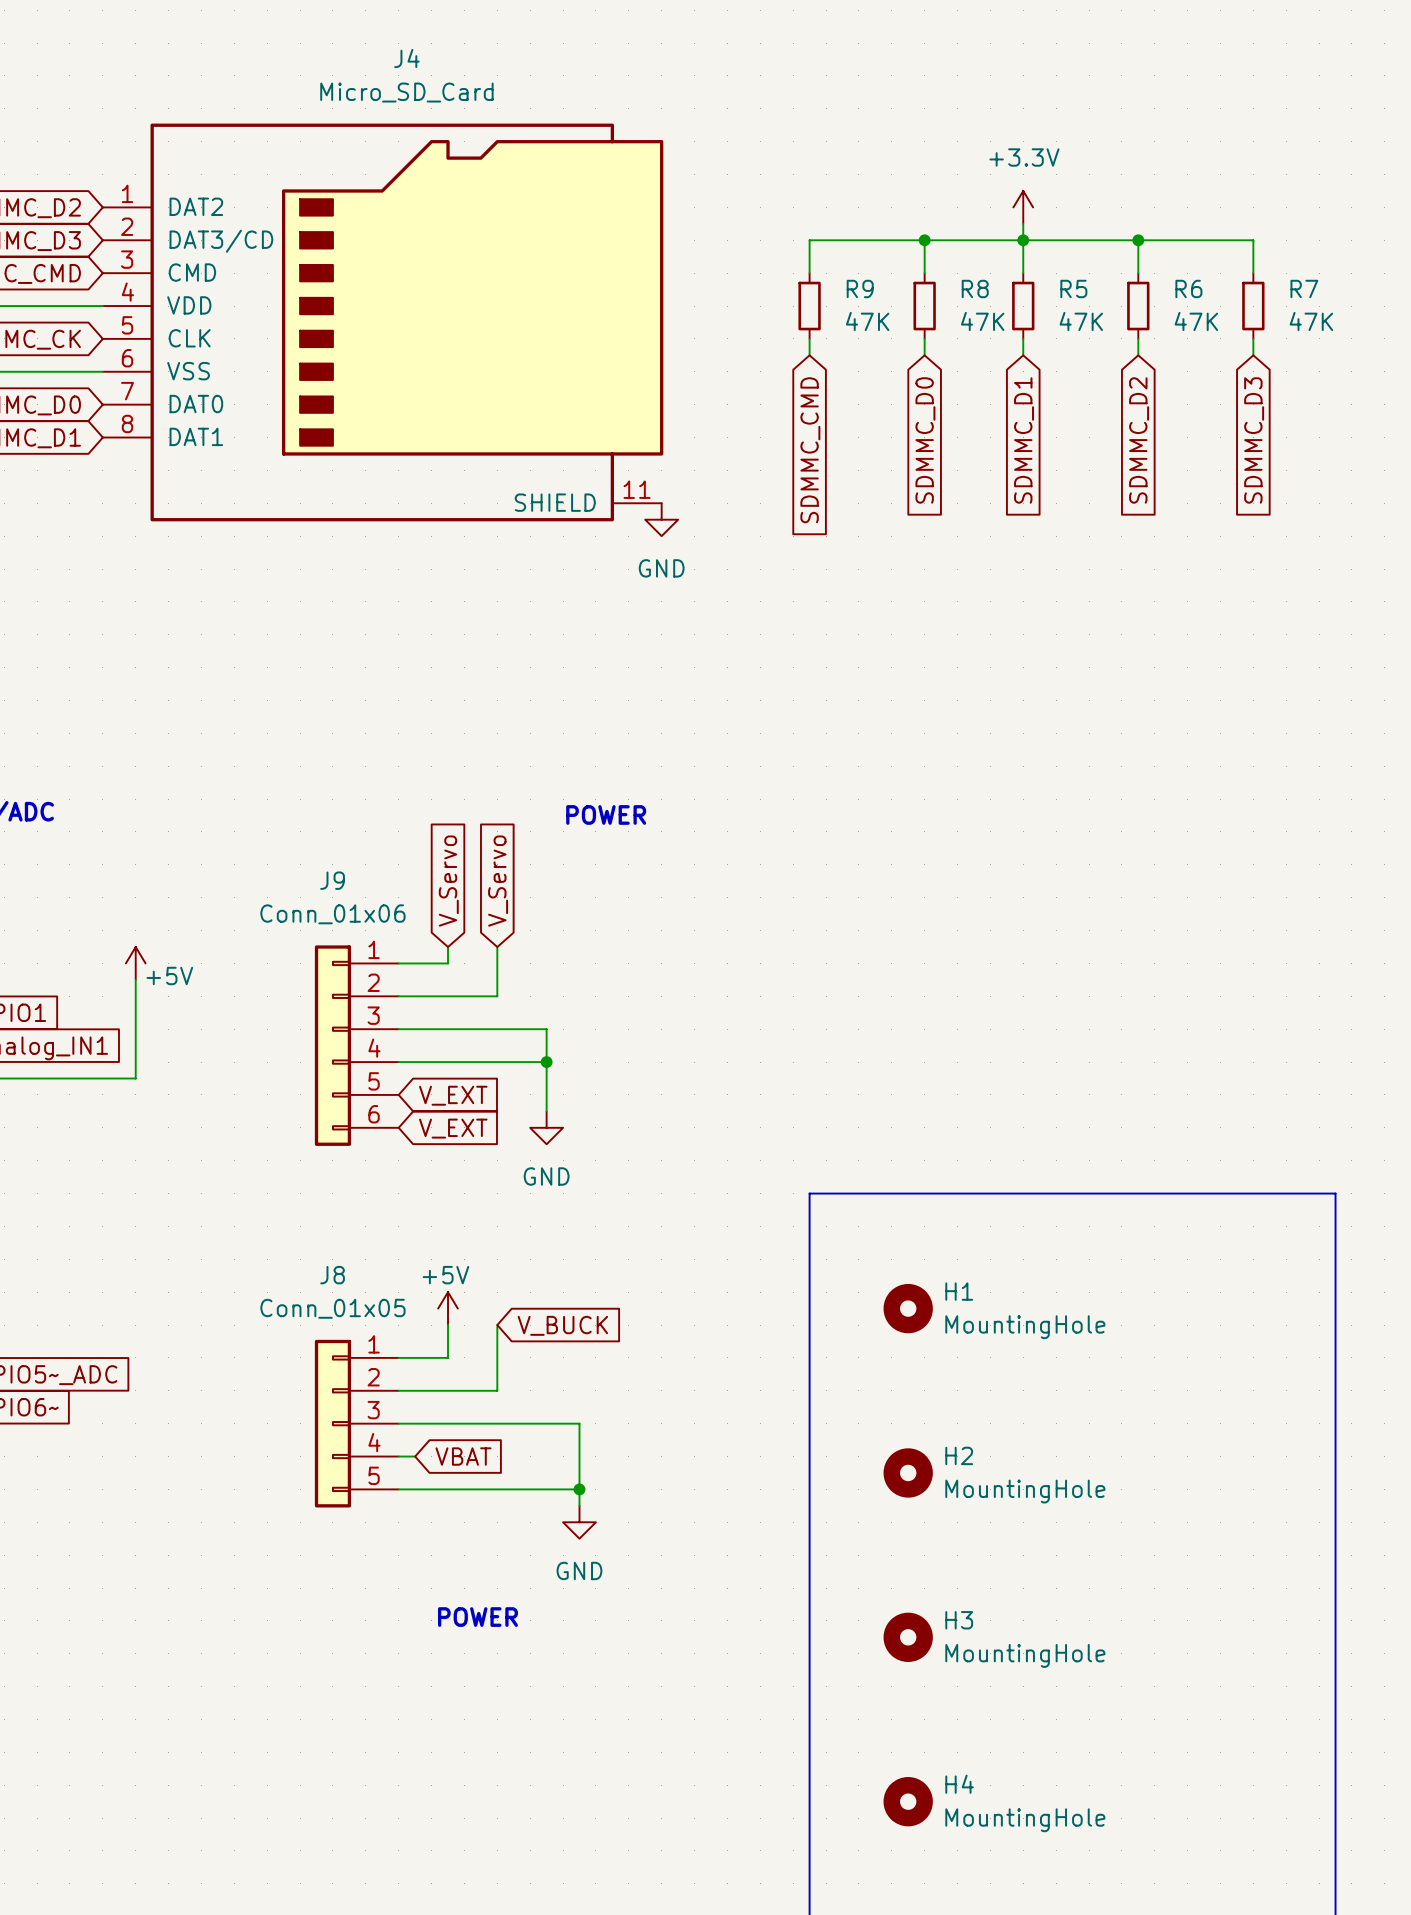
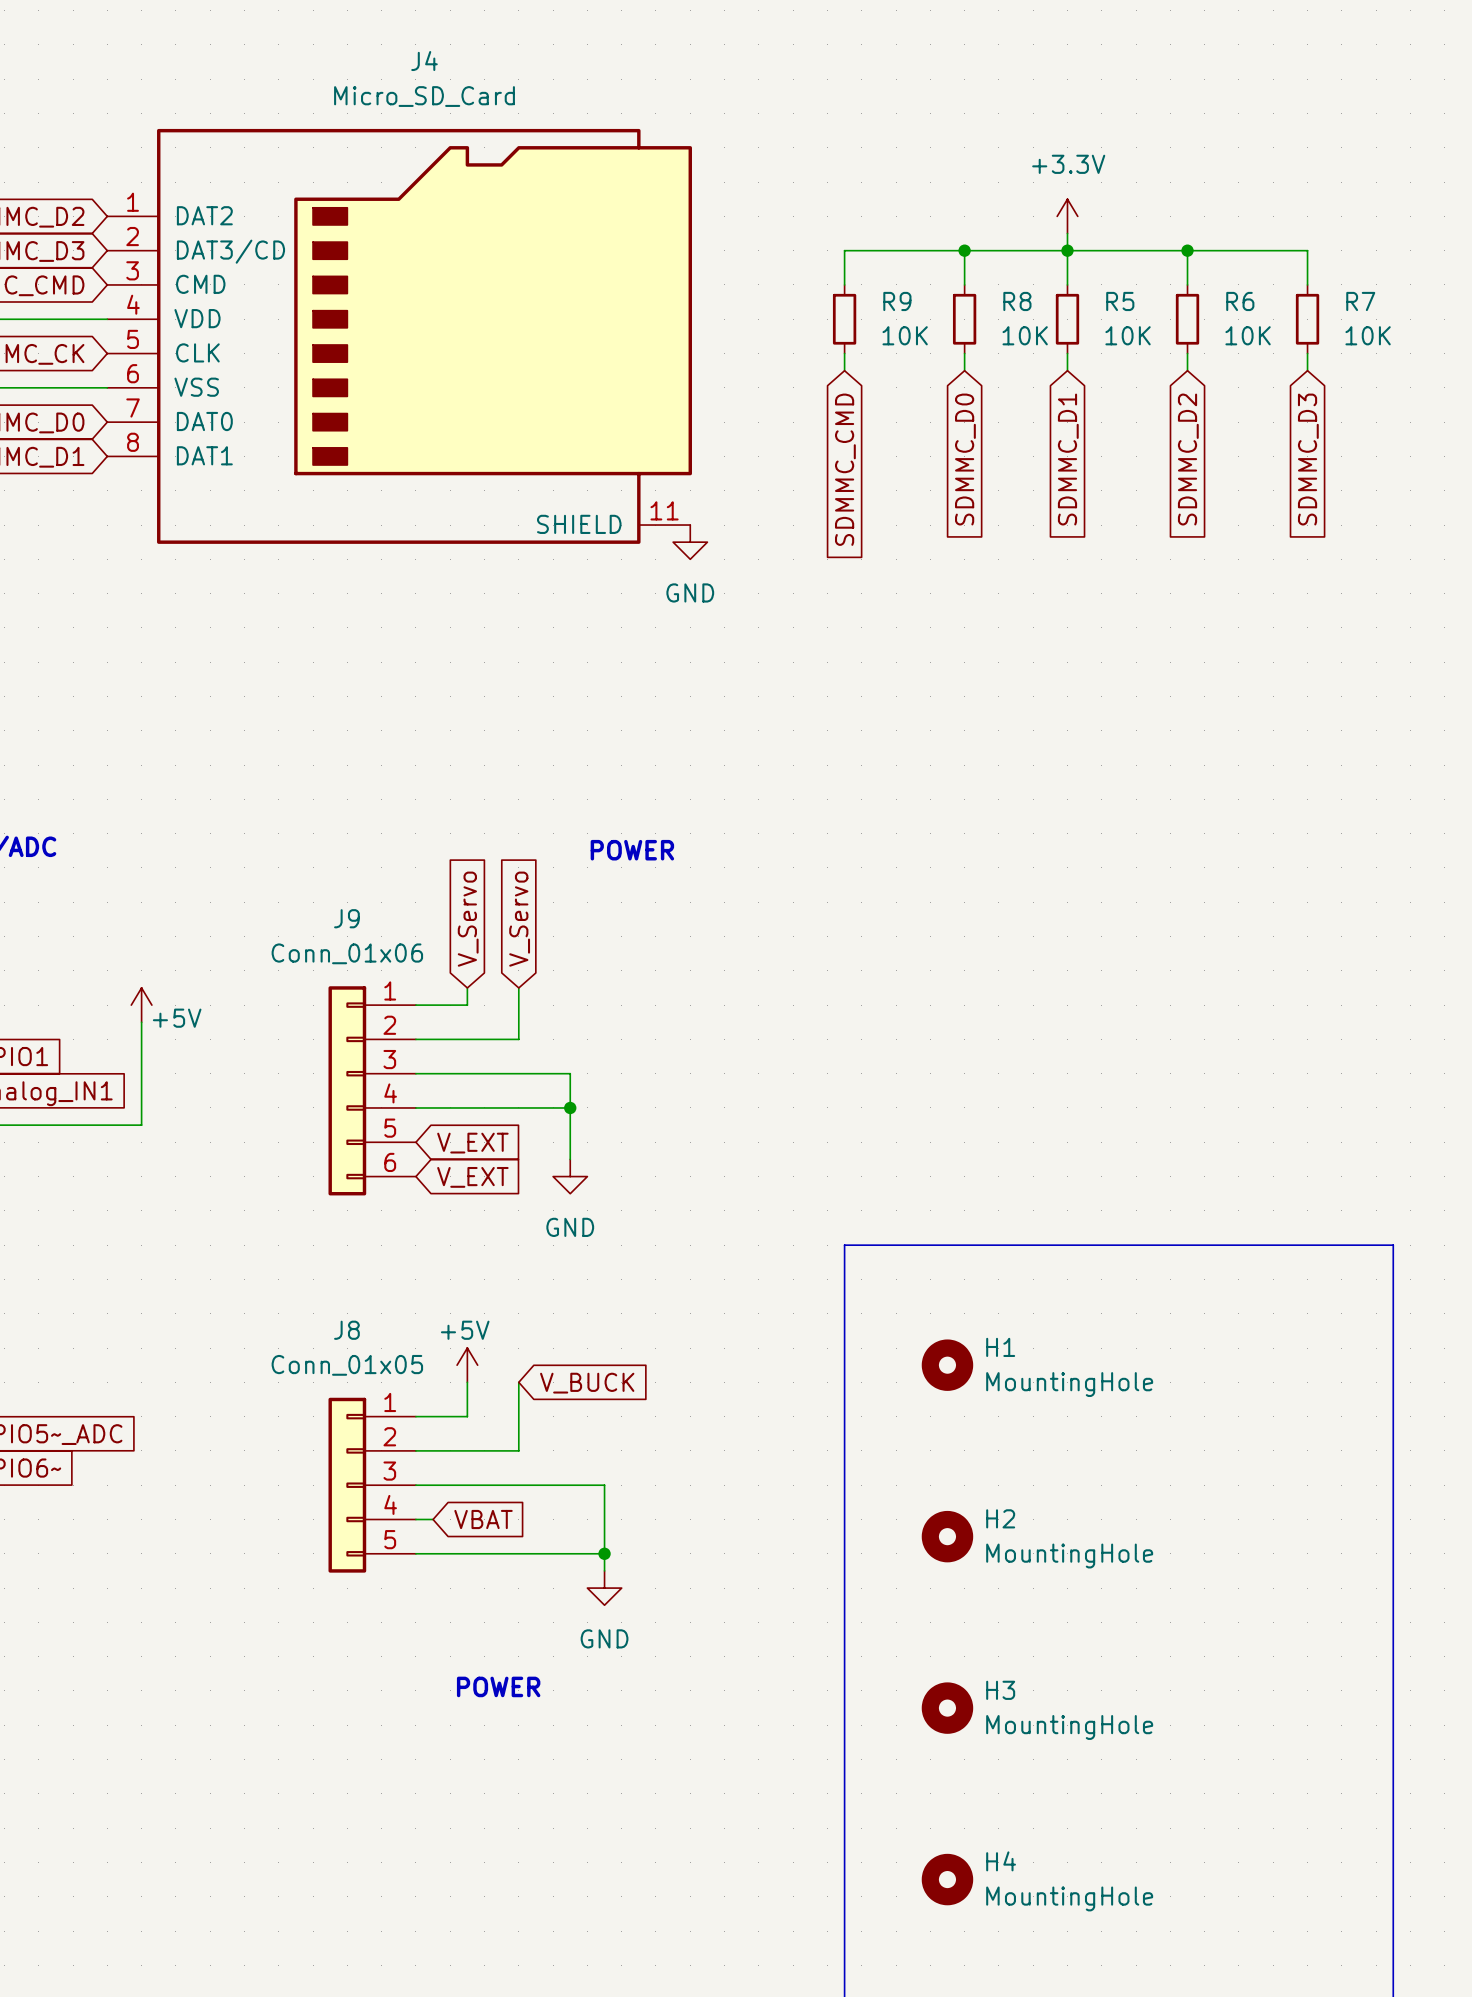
R9 value: 47K (867, 321) -> 10K (905, 335)
R8 value: 47K (982, 321) -> 10K (1025, 335)
R5 value: 47K (1081, 321) -> 10K (1128, 335)
R6 value: 47K (1196, 321) -> 10K (1248, 335)
R7 value: 47K (1311, 321) -> 10K (1368, 335)

